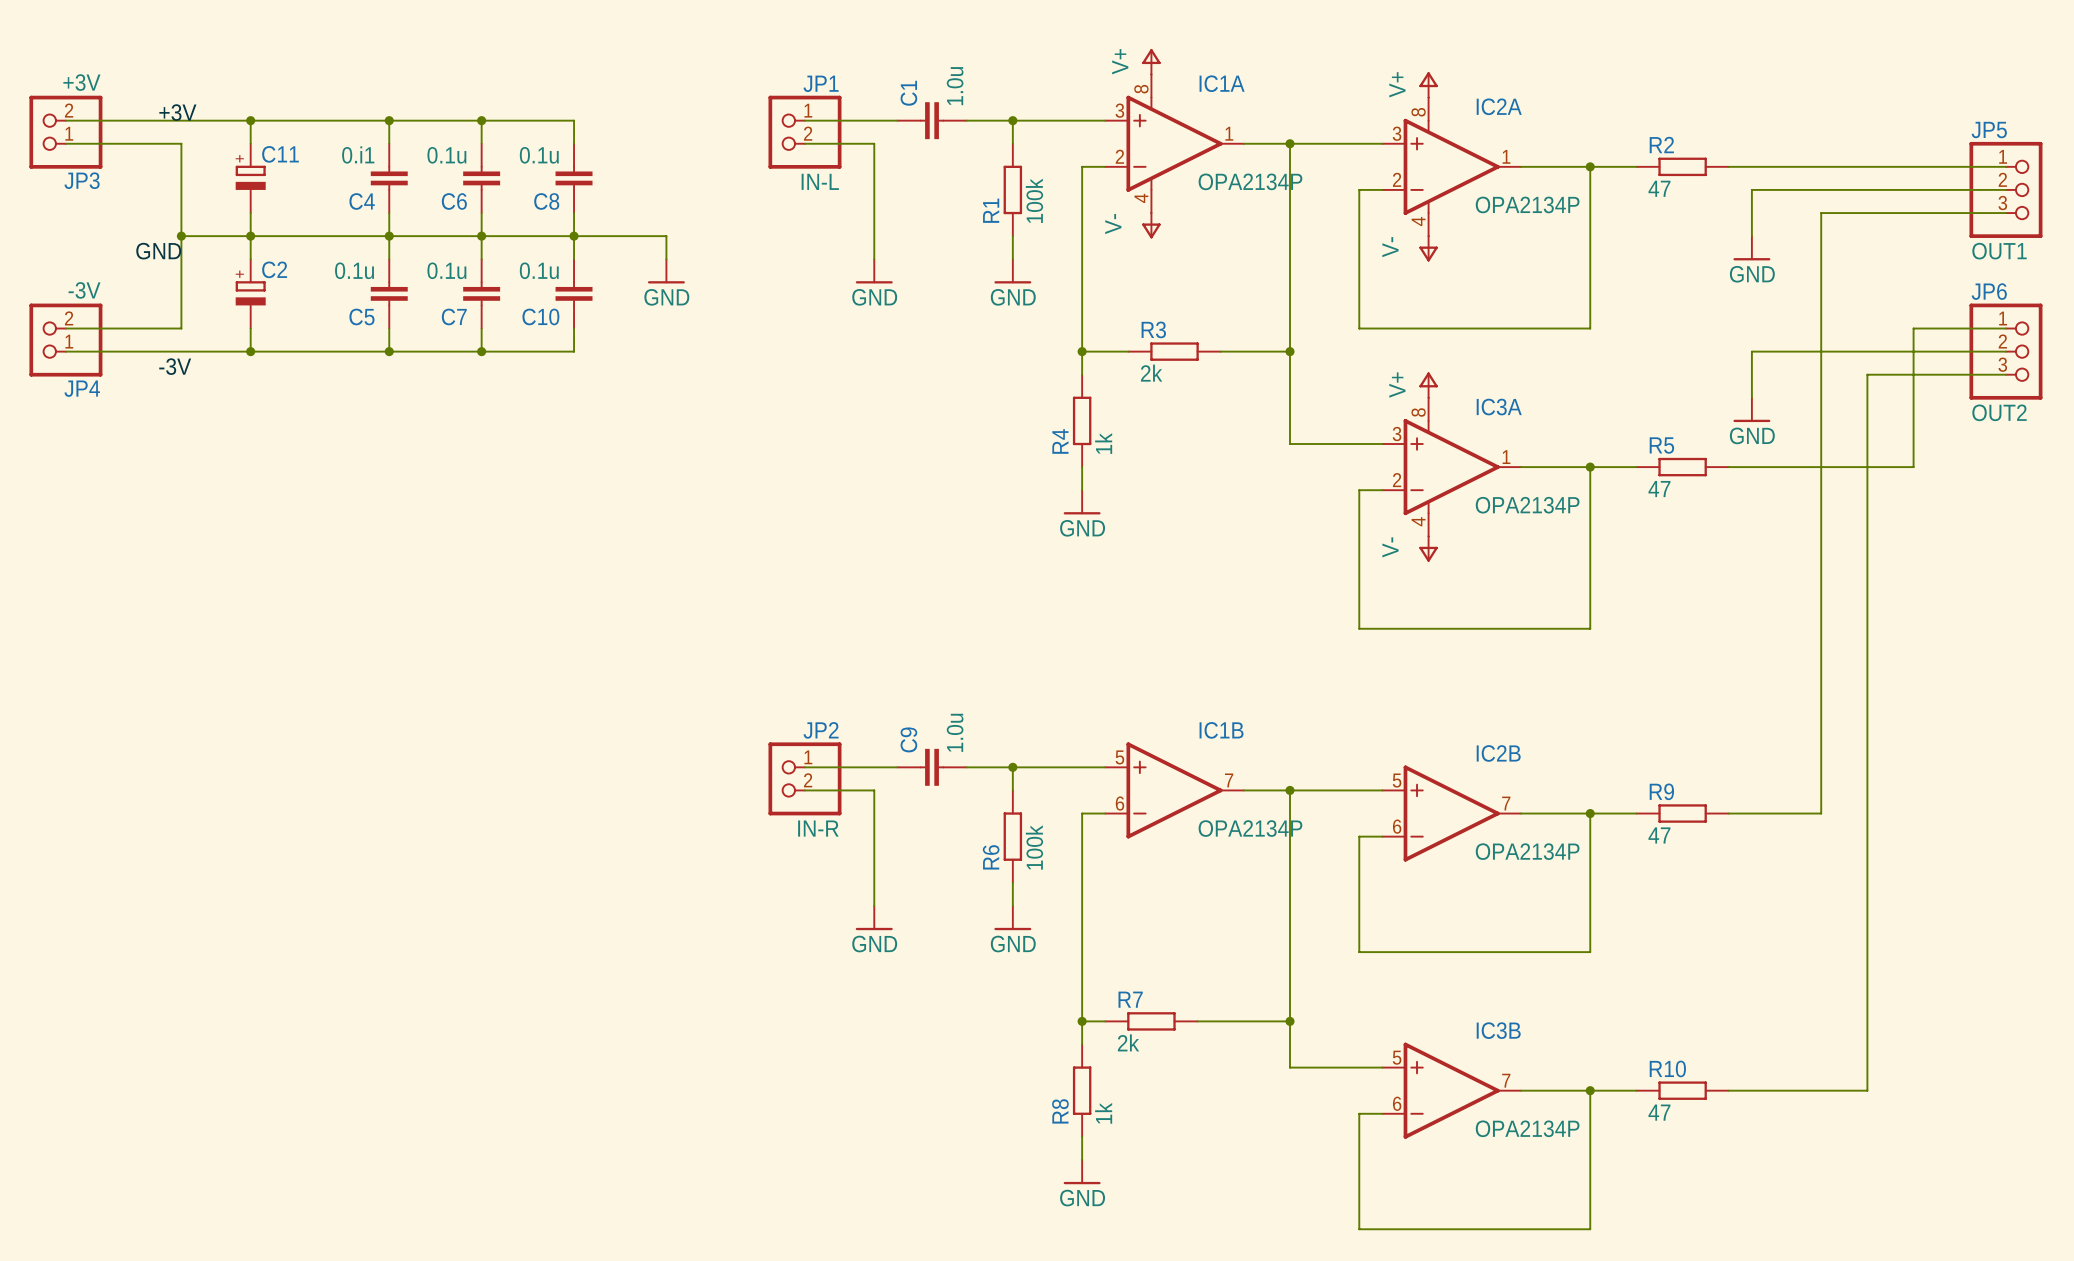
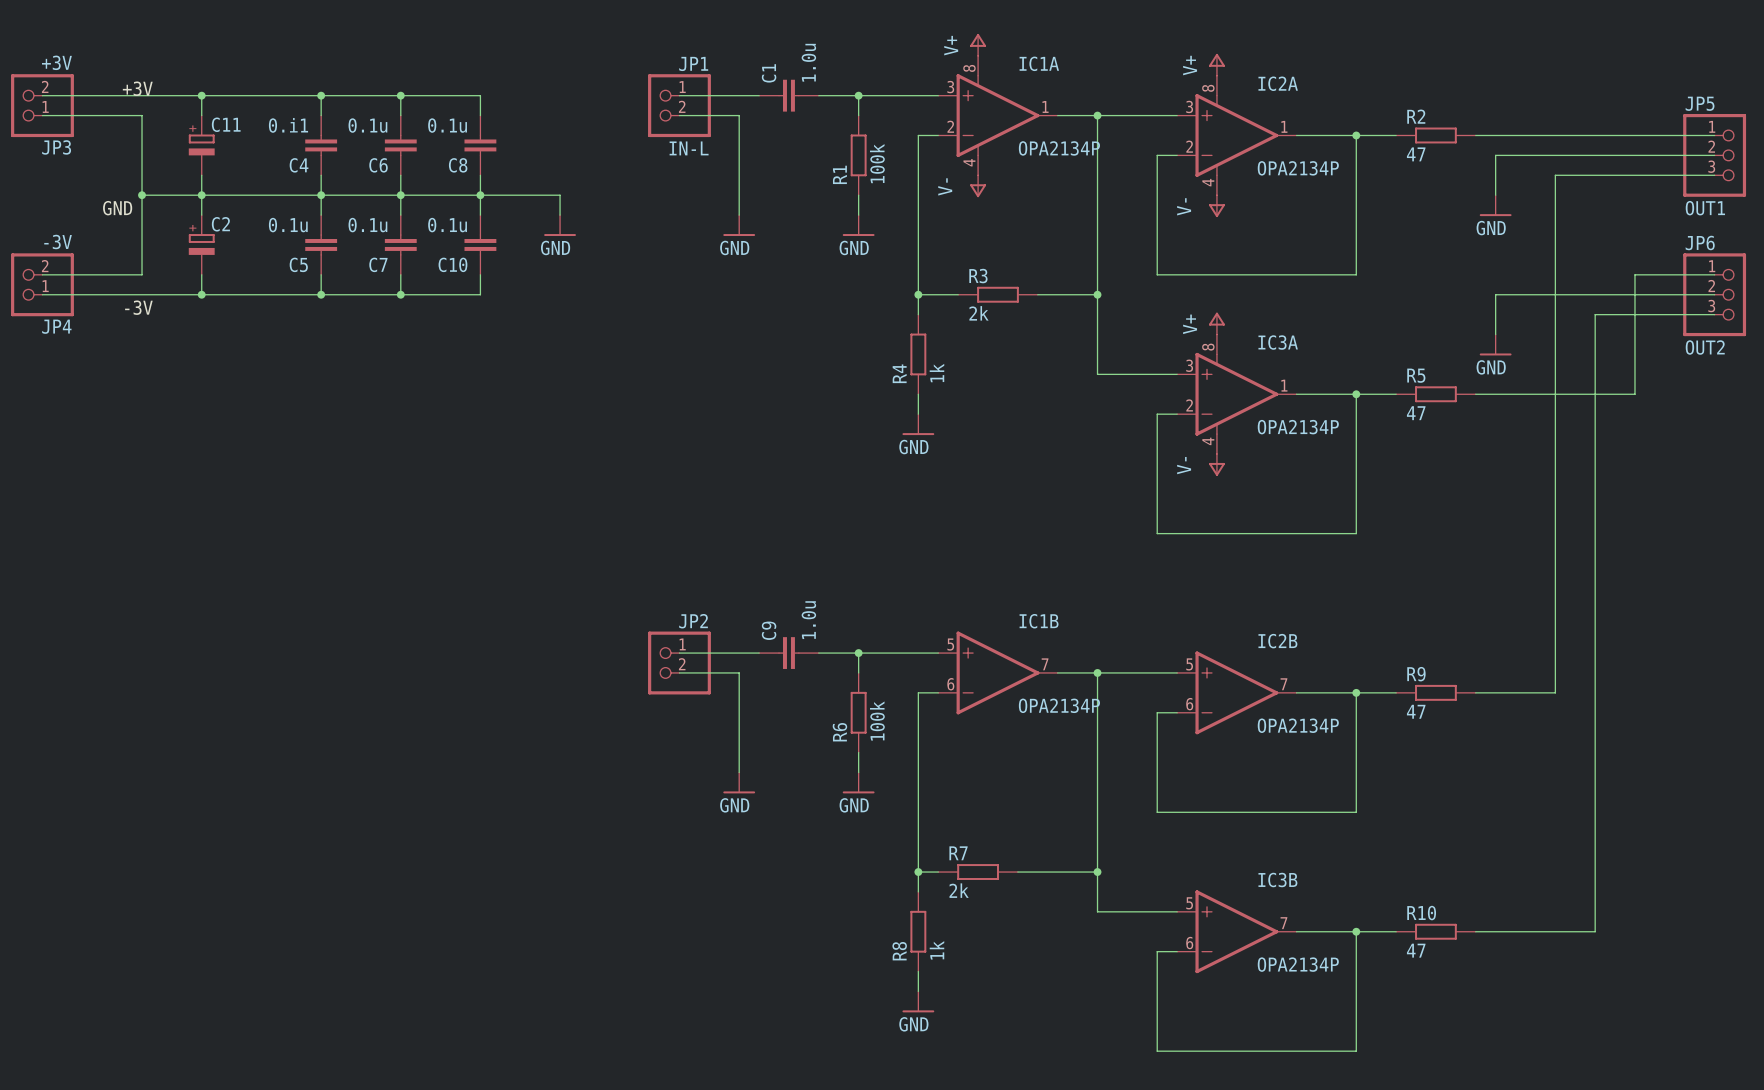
JP2 value: IN-R (818, 828) -> none

